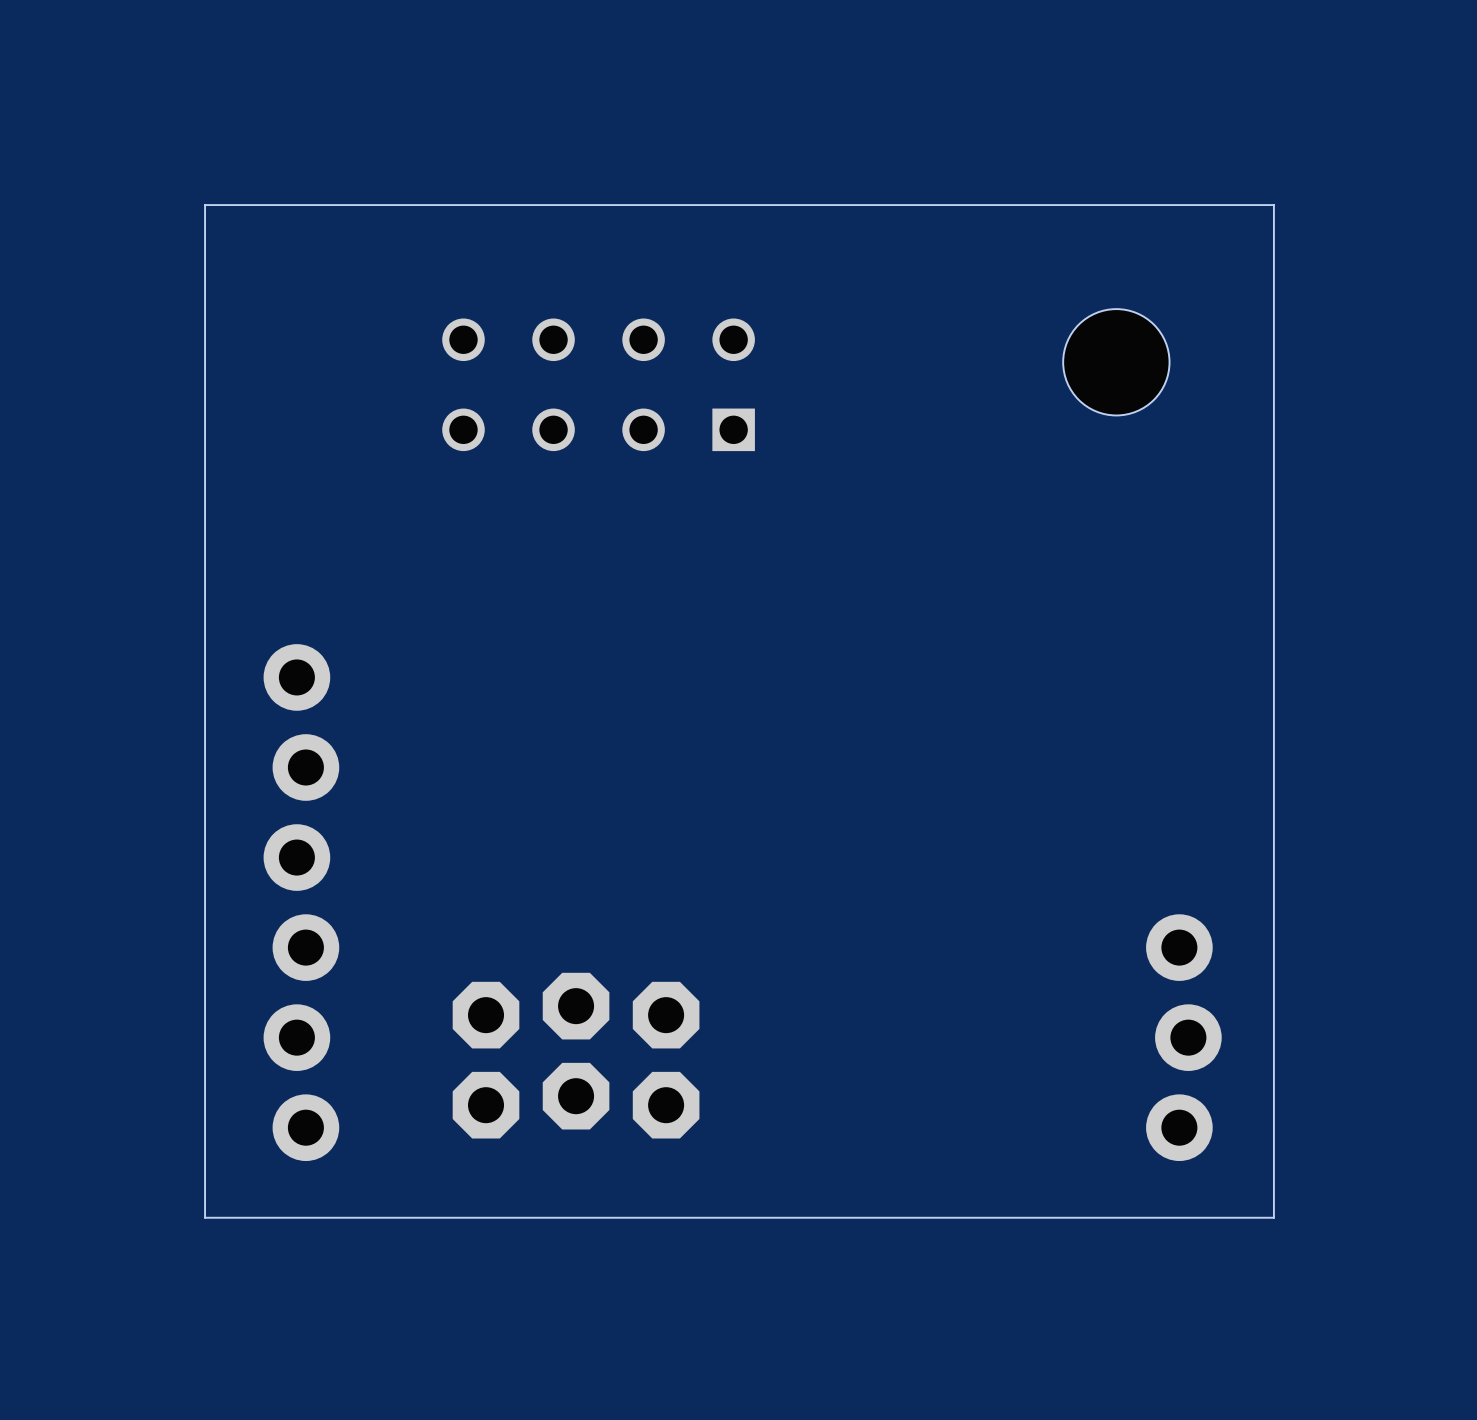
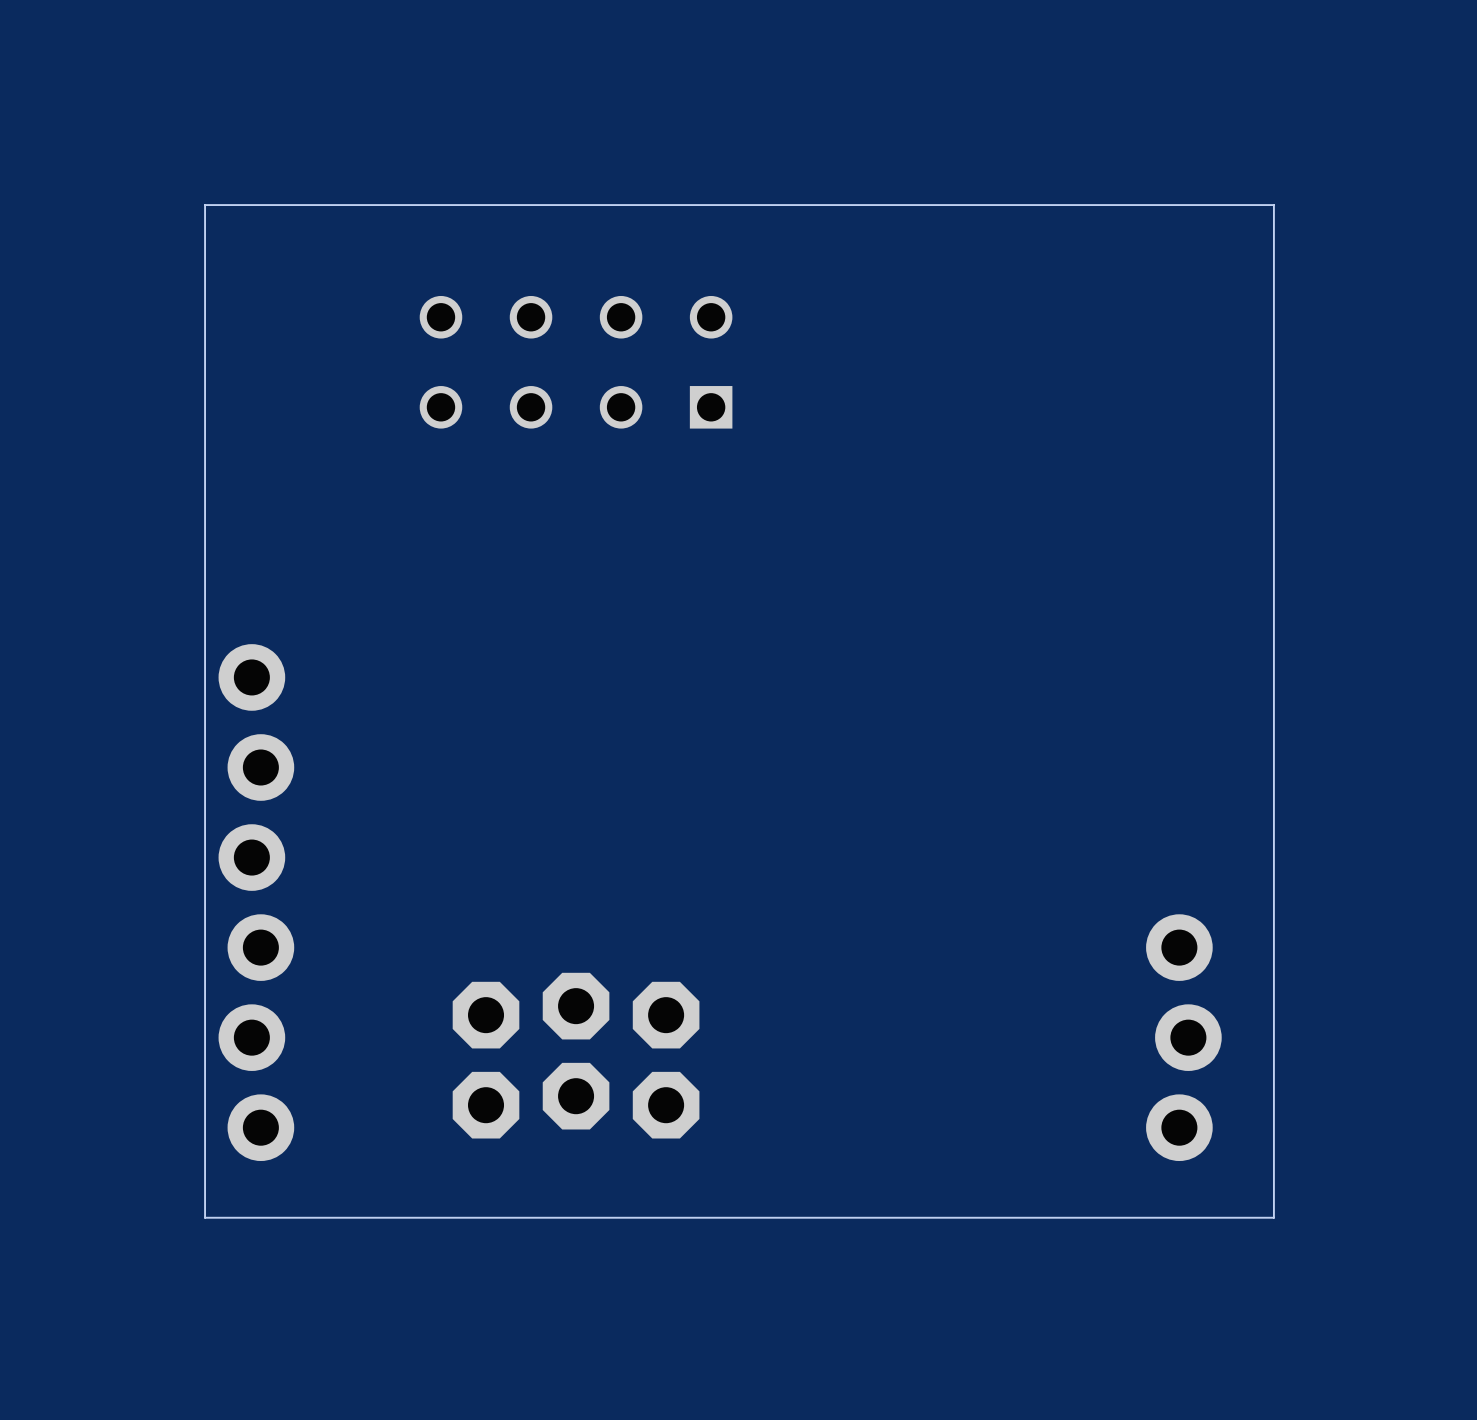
part: (1116, 362) -> none
part position: (598, 384) -> (576, 362)
part position: (301, 902) -> (256, 902)

